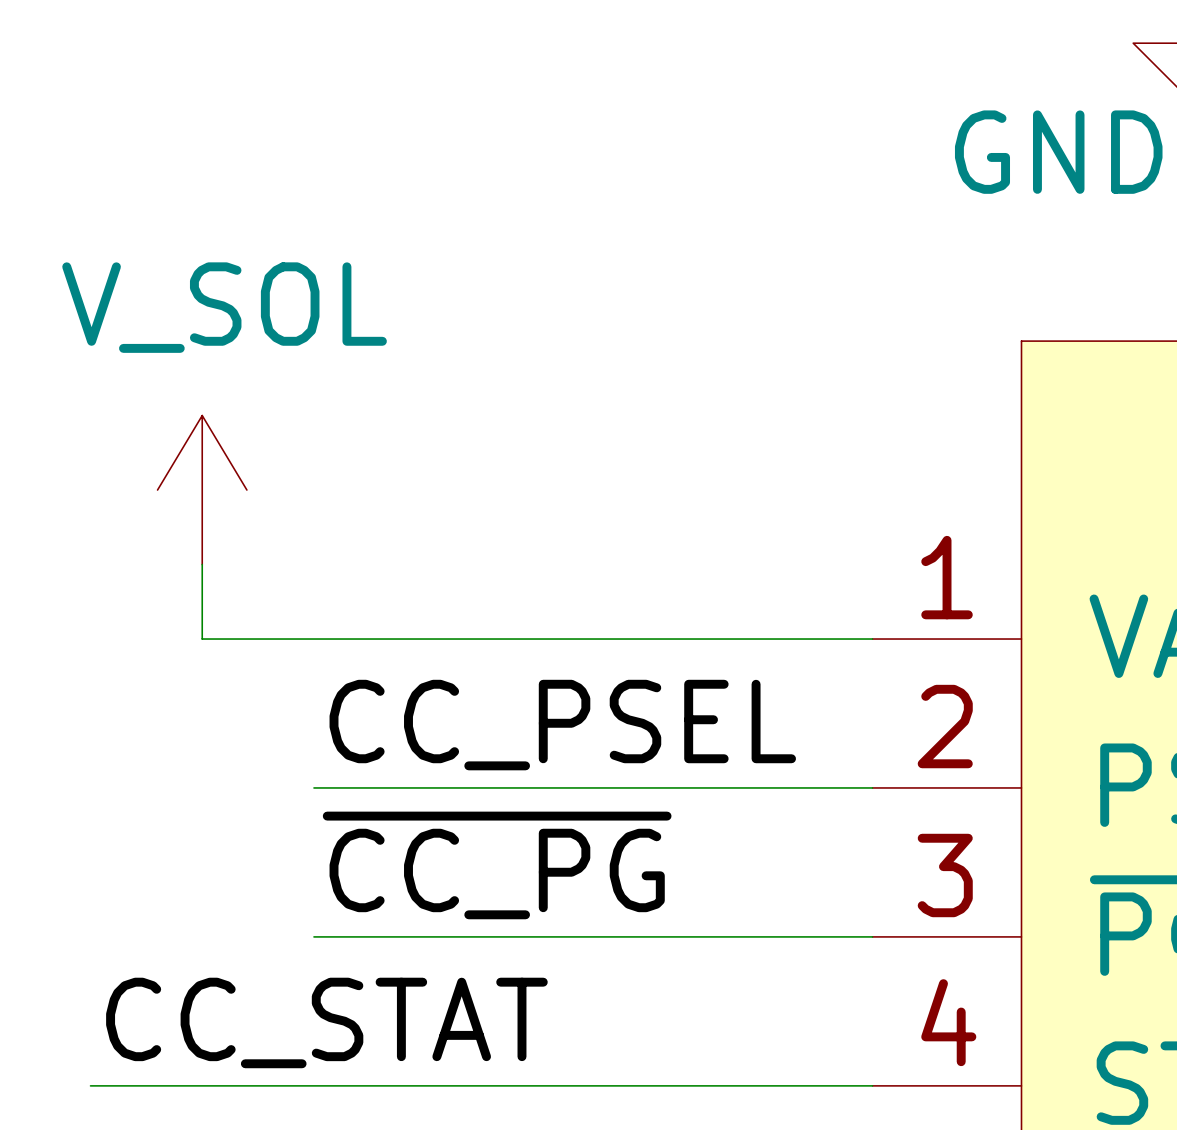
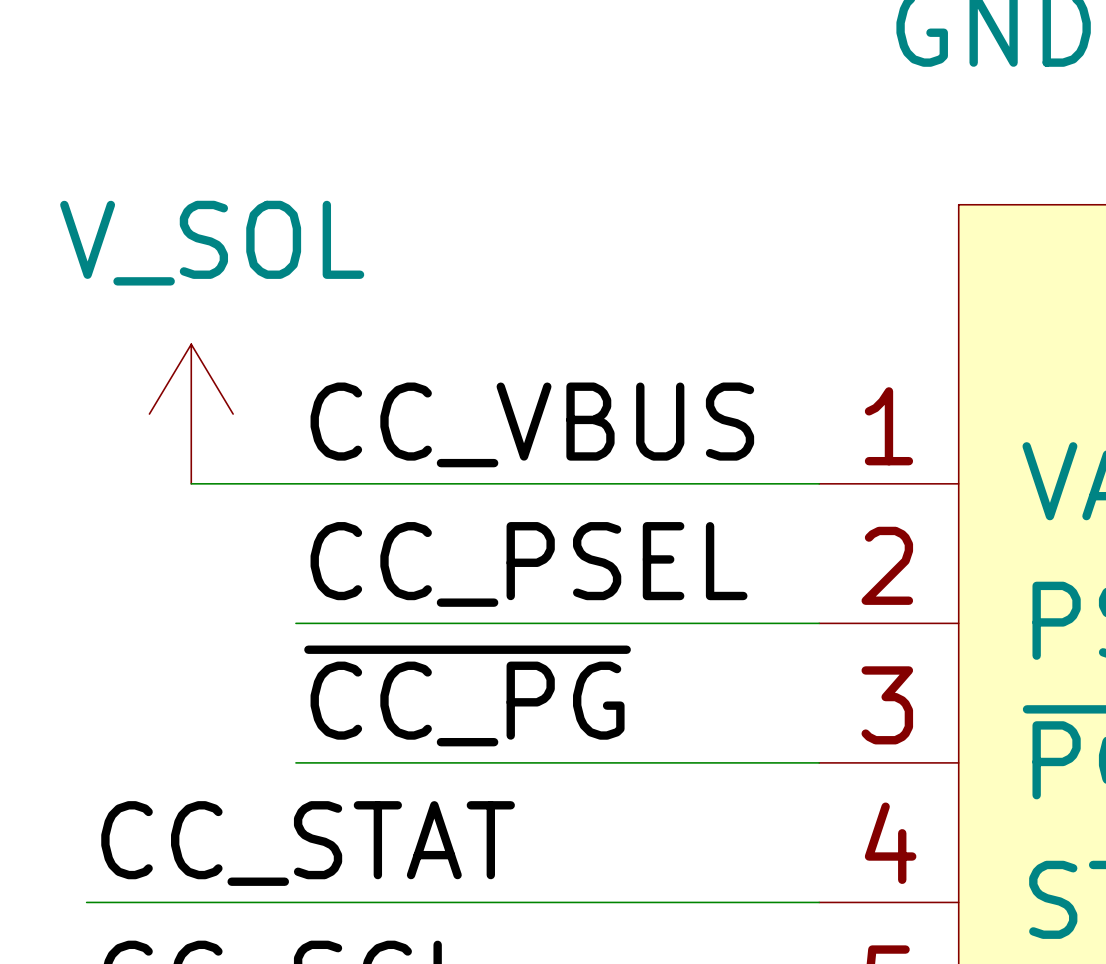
power symbol position: V_SOL (202, 490) -> V_SOL (191, 414)
label: none -> CC_VBUS (532, 424)

